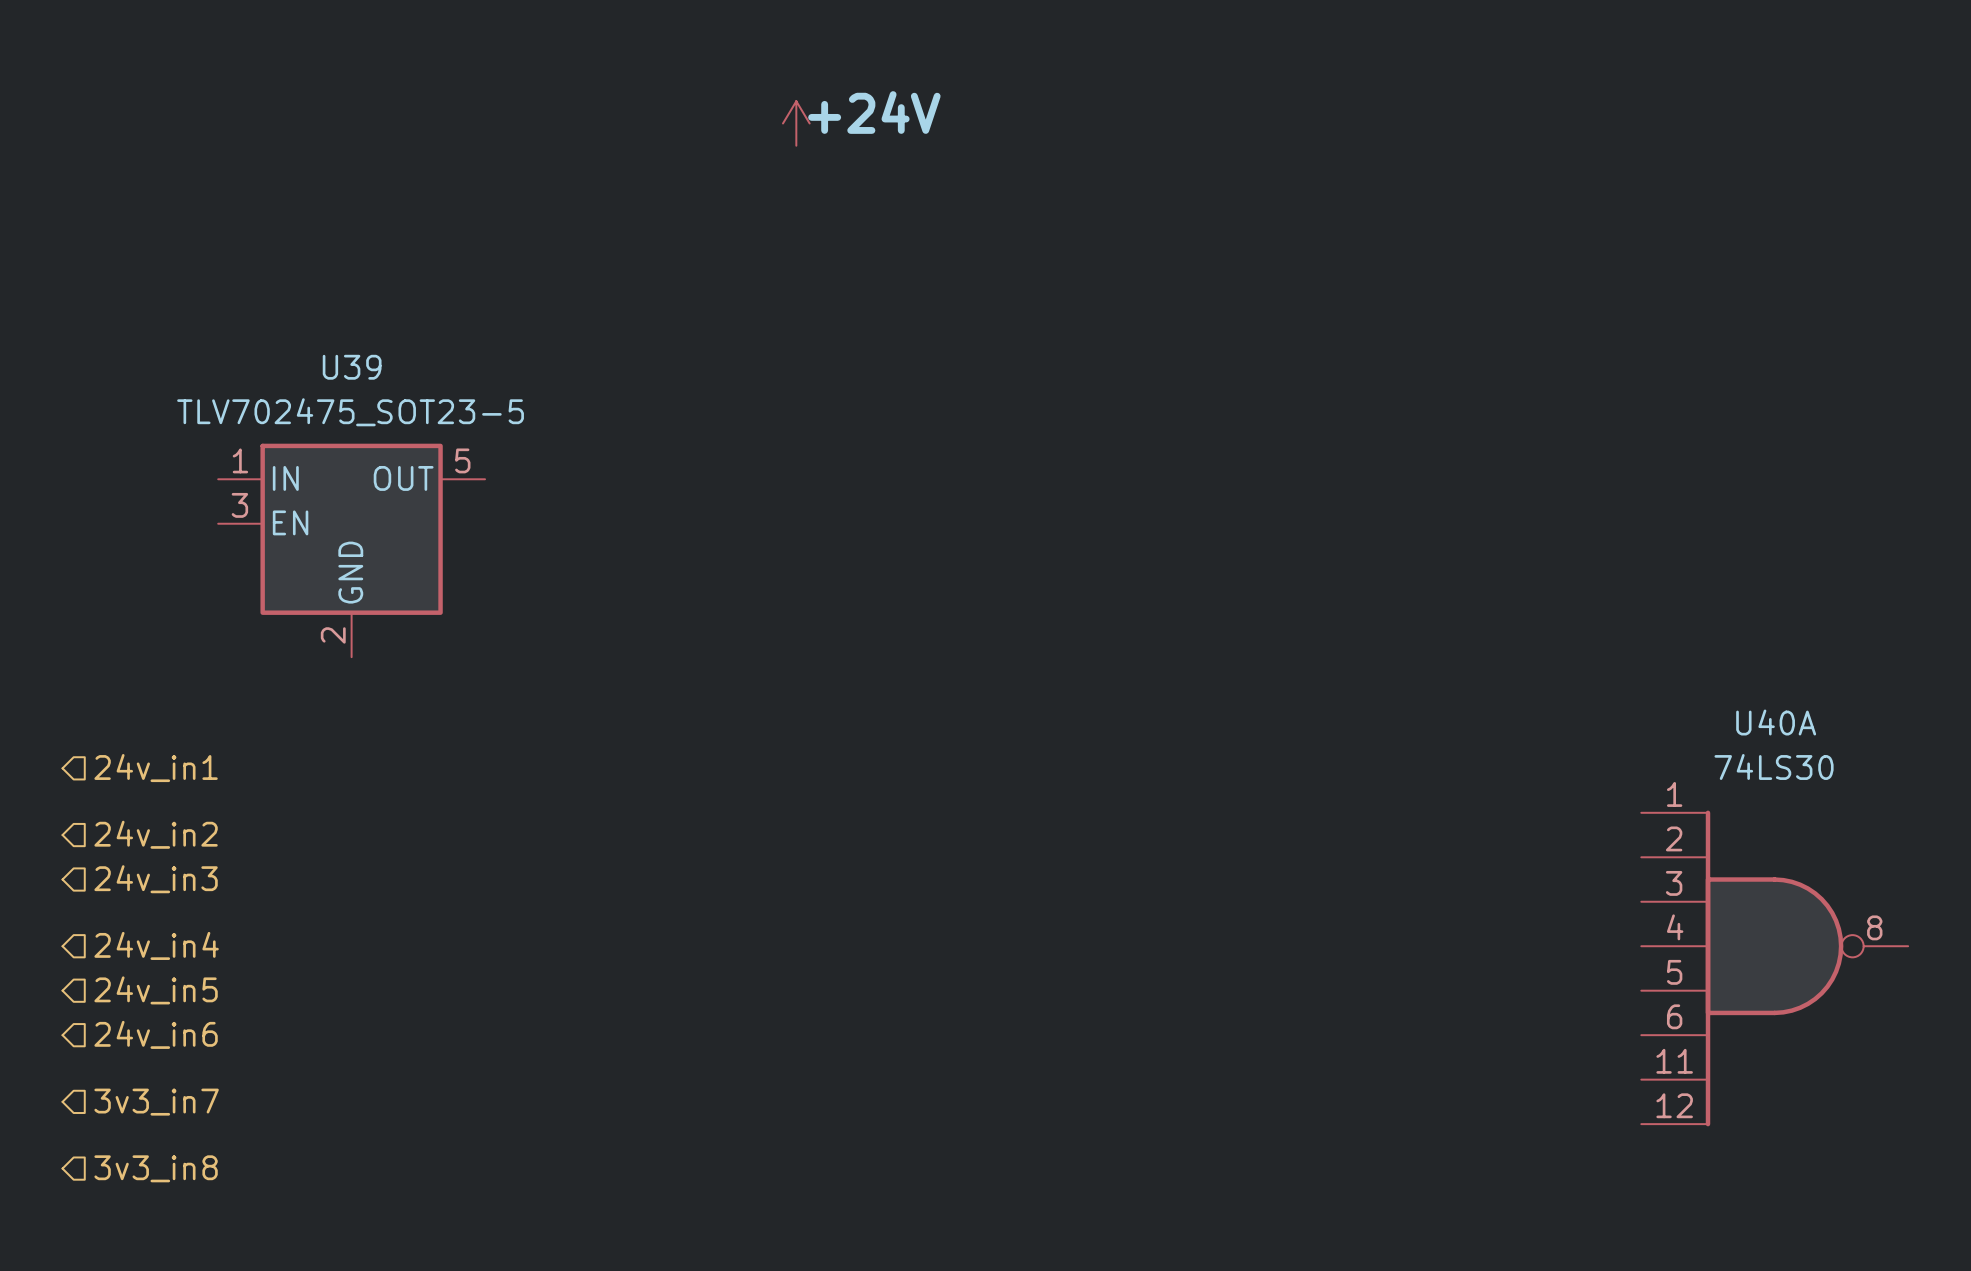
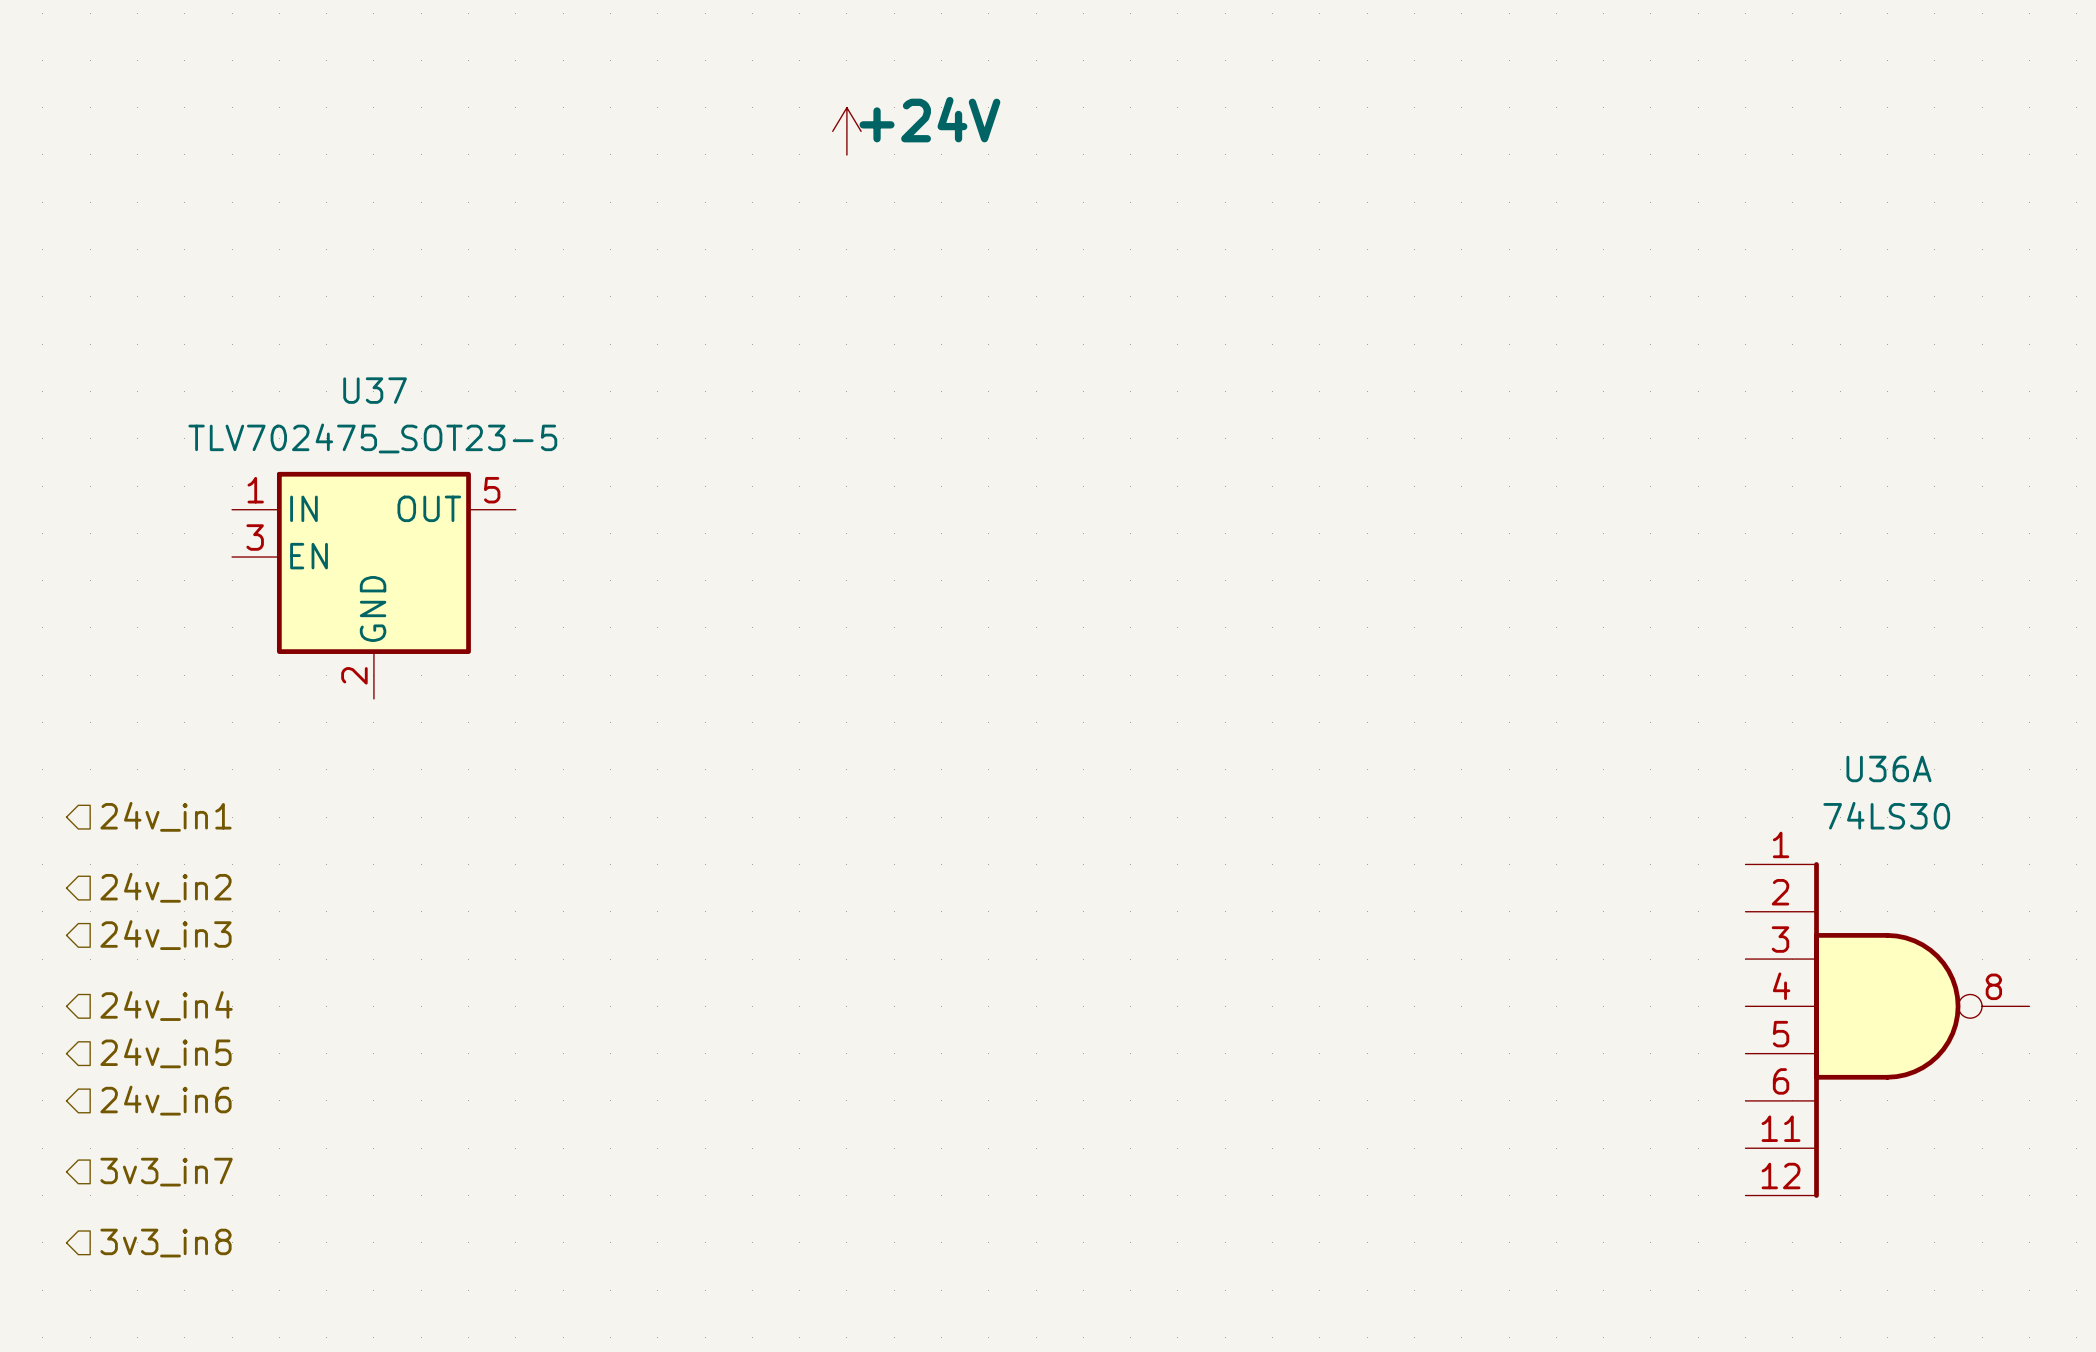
U39 name: U39 (352, 367) -> U37 (375, 390)
U40A name: U40A (1776, 722) -> U36A (1888, 768)

